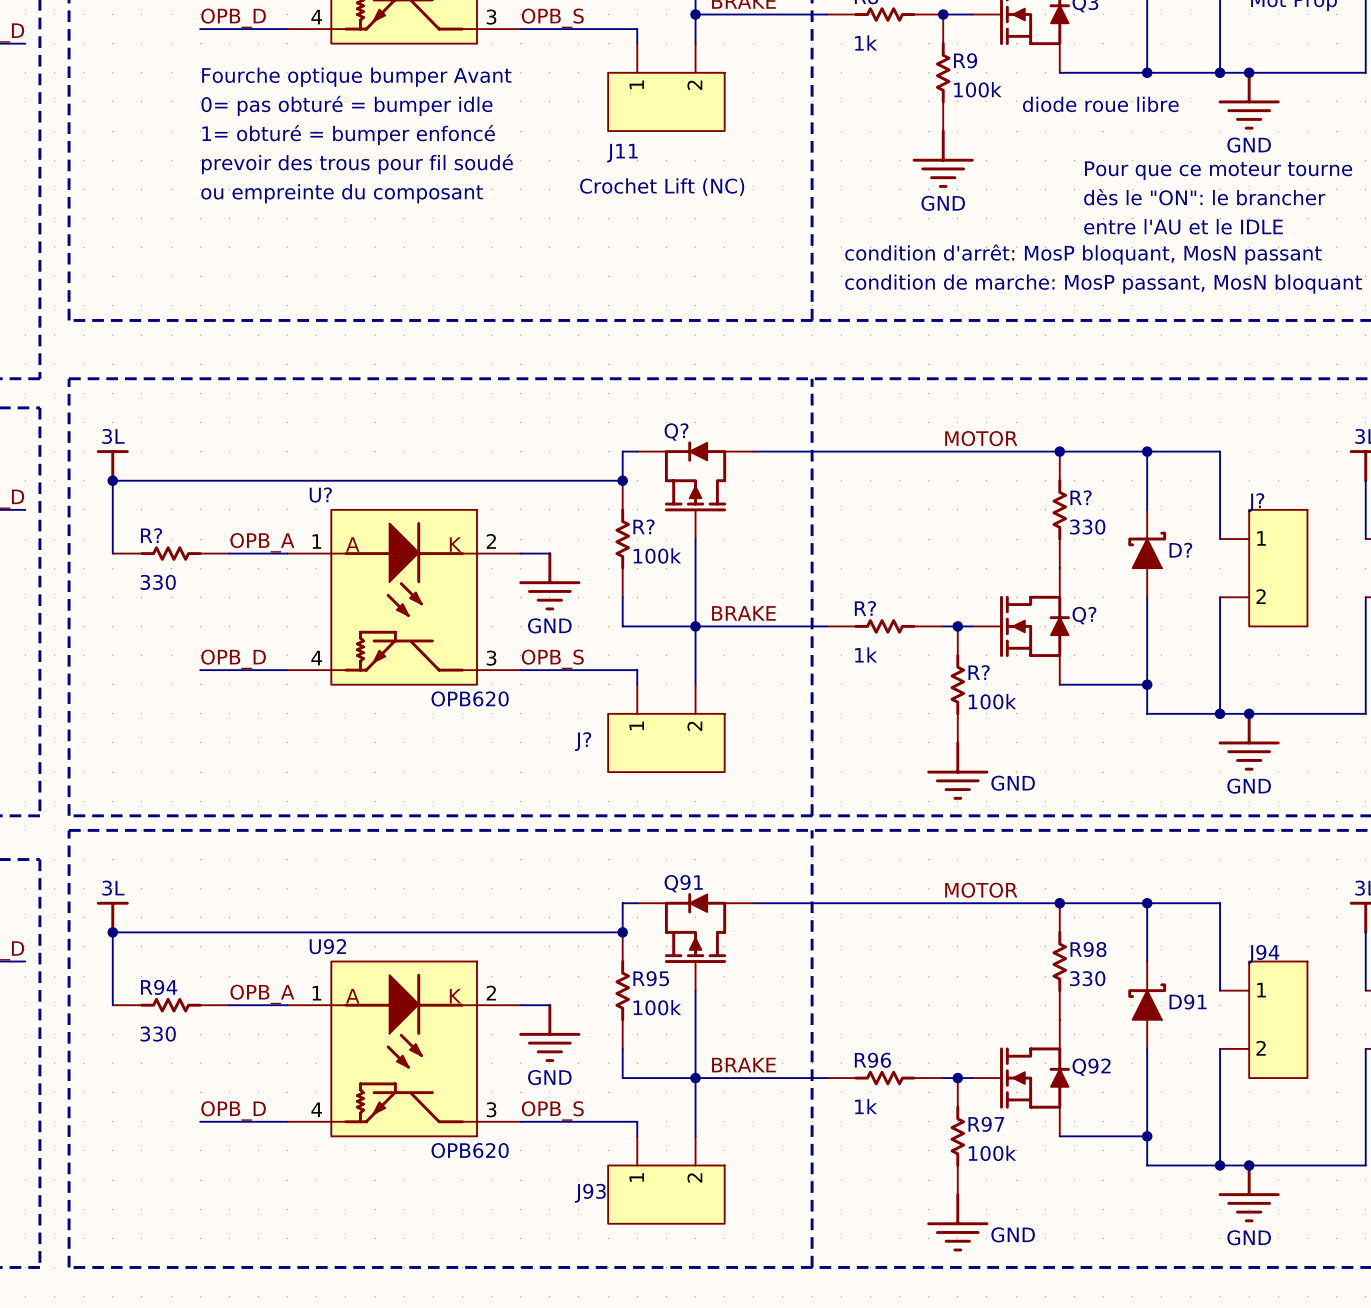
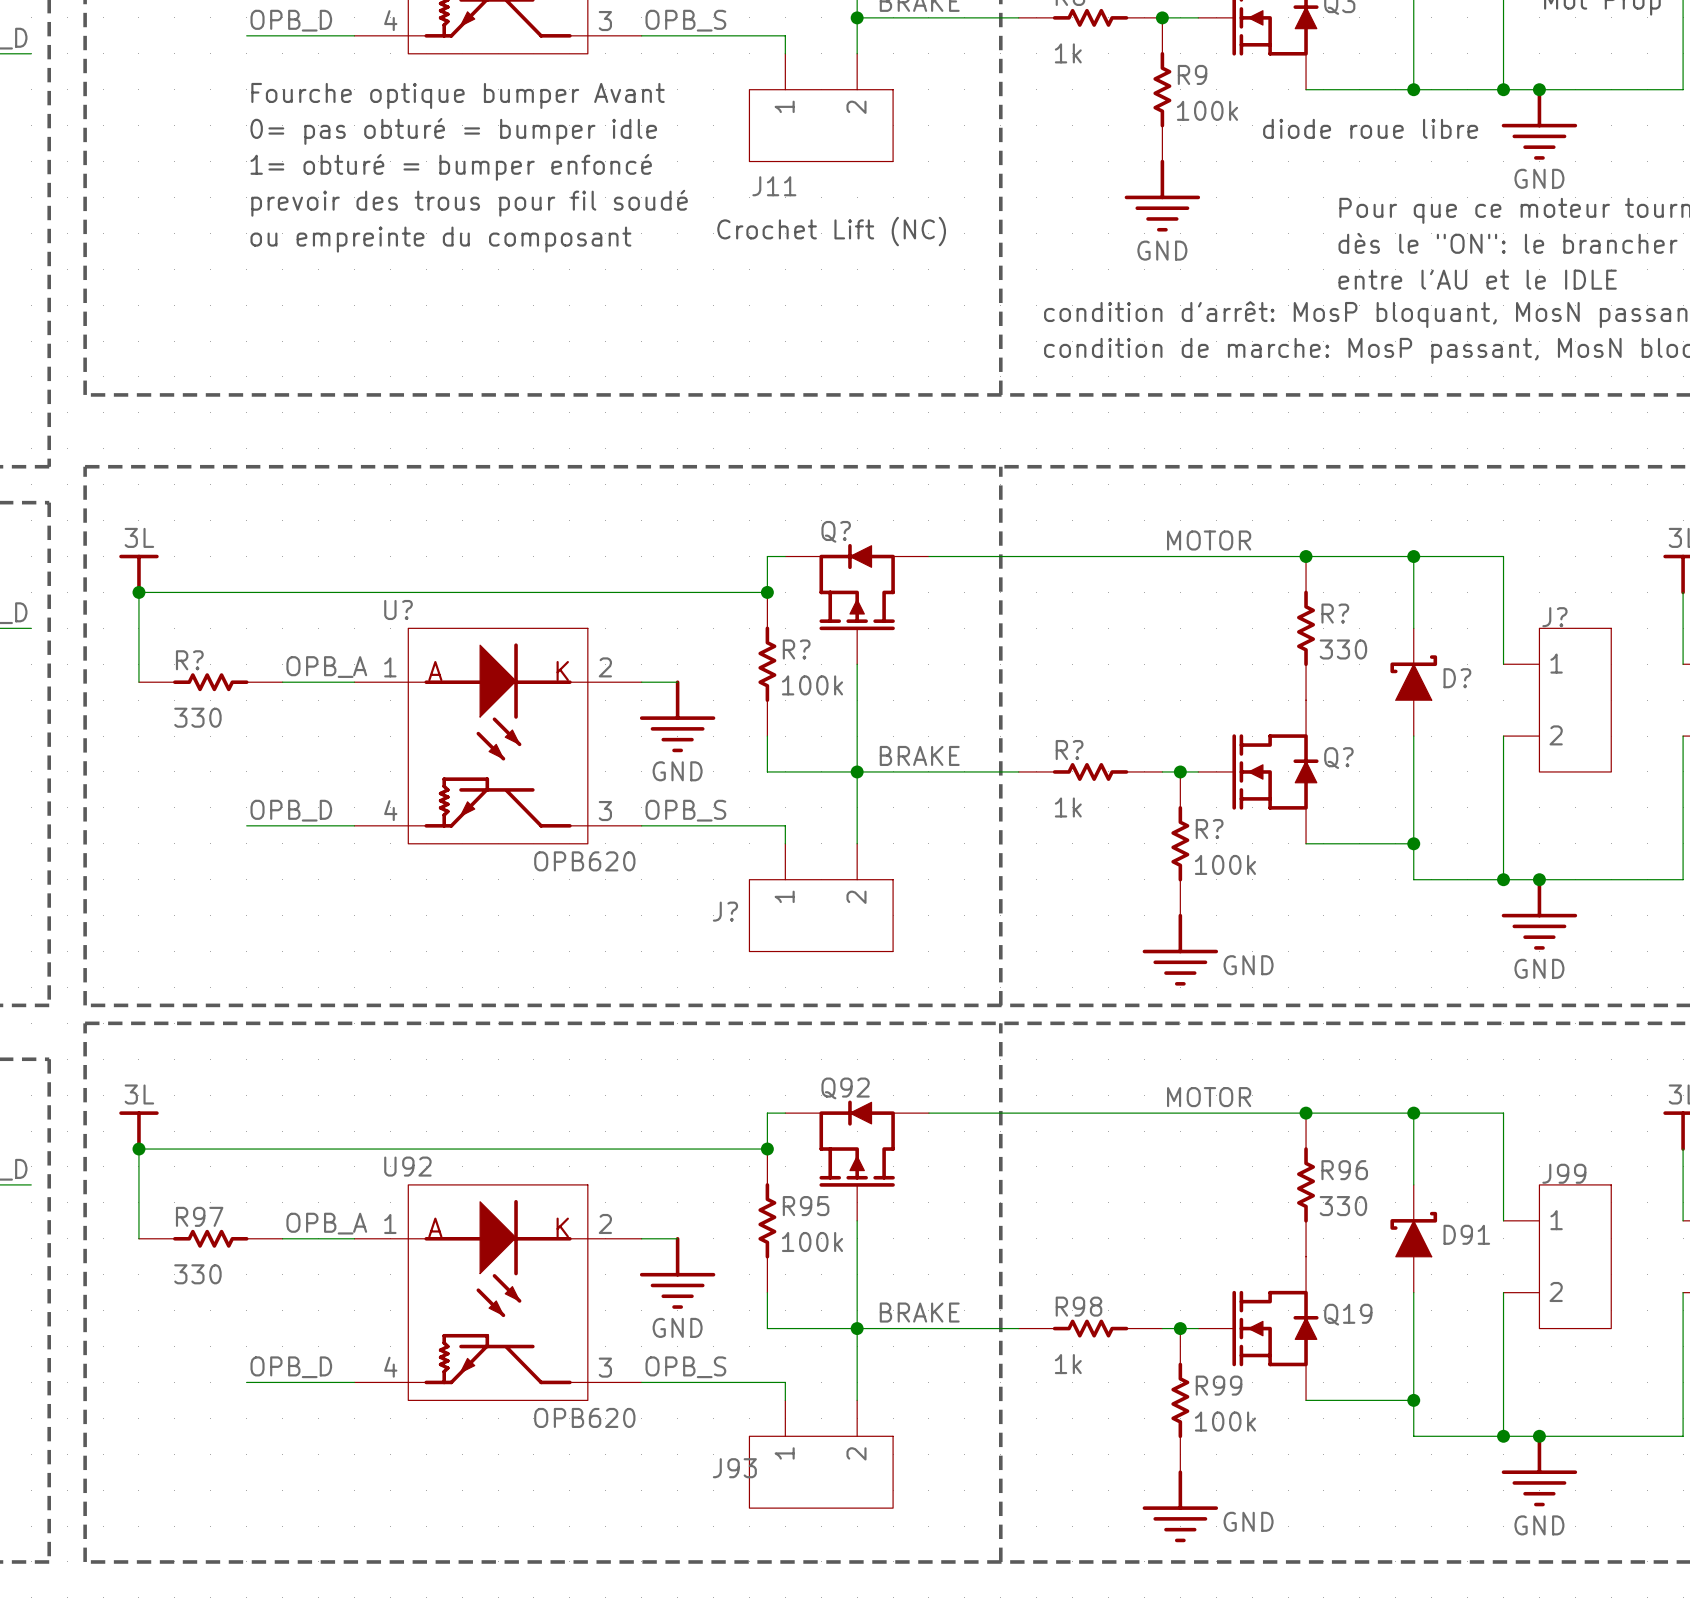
Q91 name: Q91 (683, 883) -> Q92 (845, 1088)
R98 name: R98 (1088, 949) -> R96 (1344, 1170)
J94 name: J94 (1263, 954) -> J99 (1564, 1173)
R94 name: R94 (159, 987) -> R97 (199, 1216)
R96 name: R96 (872, 1060) -> R98 (1078, 1306)
Q92 name: Q92 (1091, 1067) -> Q19 (1348, 1314)
R97 name: R97 (986, 1124) -> R99 (1219, 1385)

